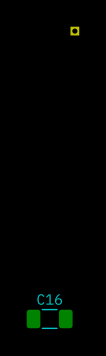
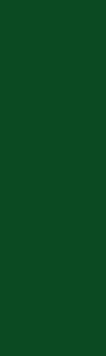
part: (74, 31) -> none
C16: (49, 318) -> none

